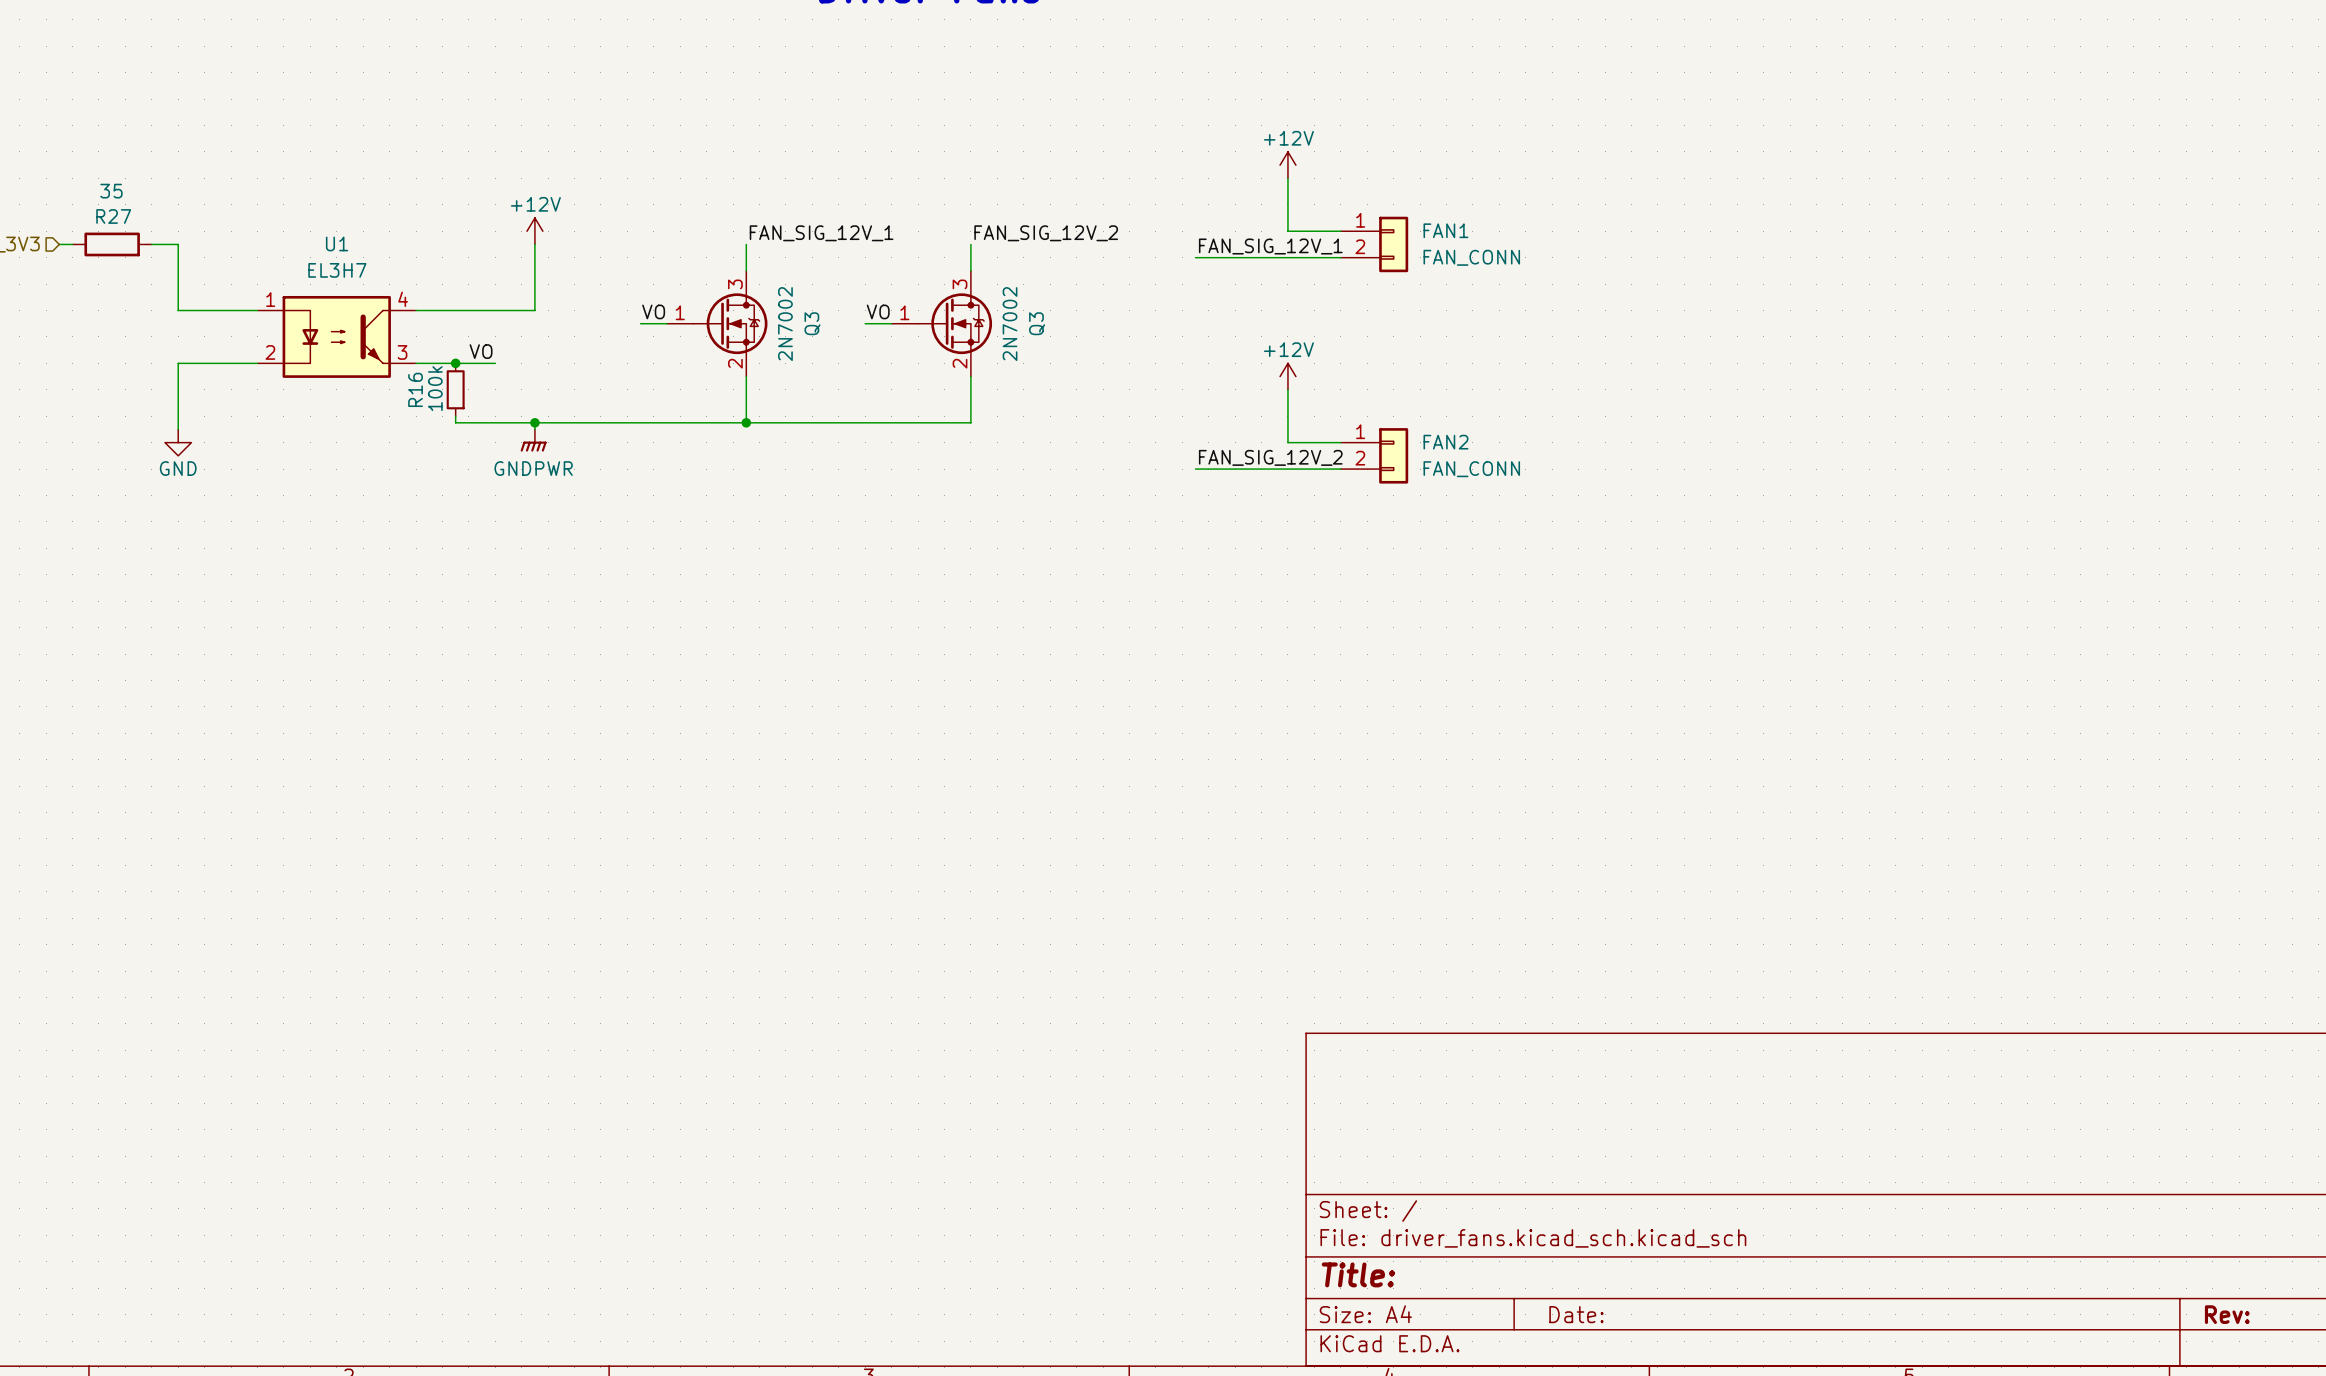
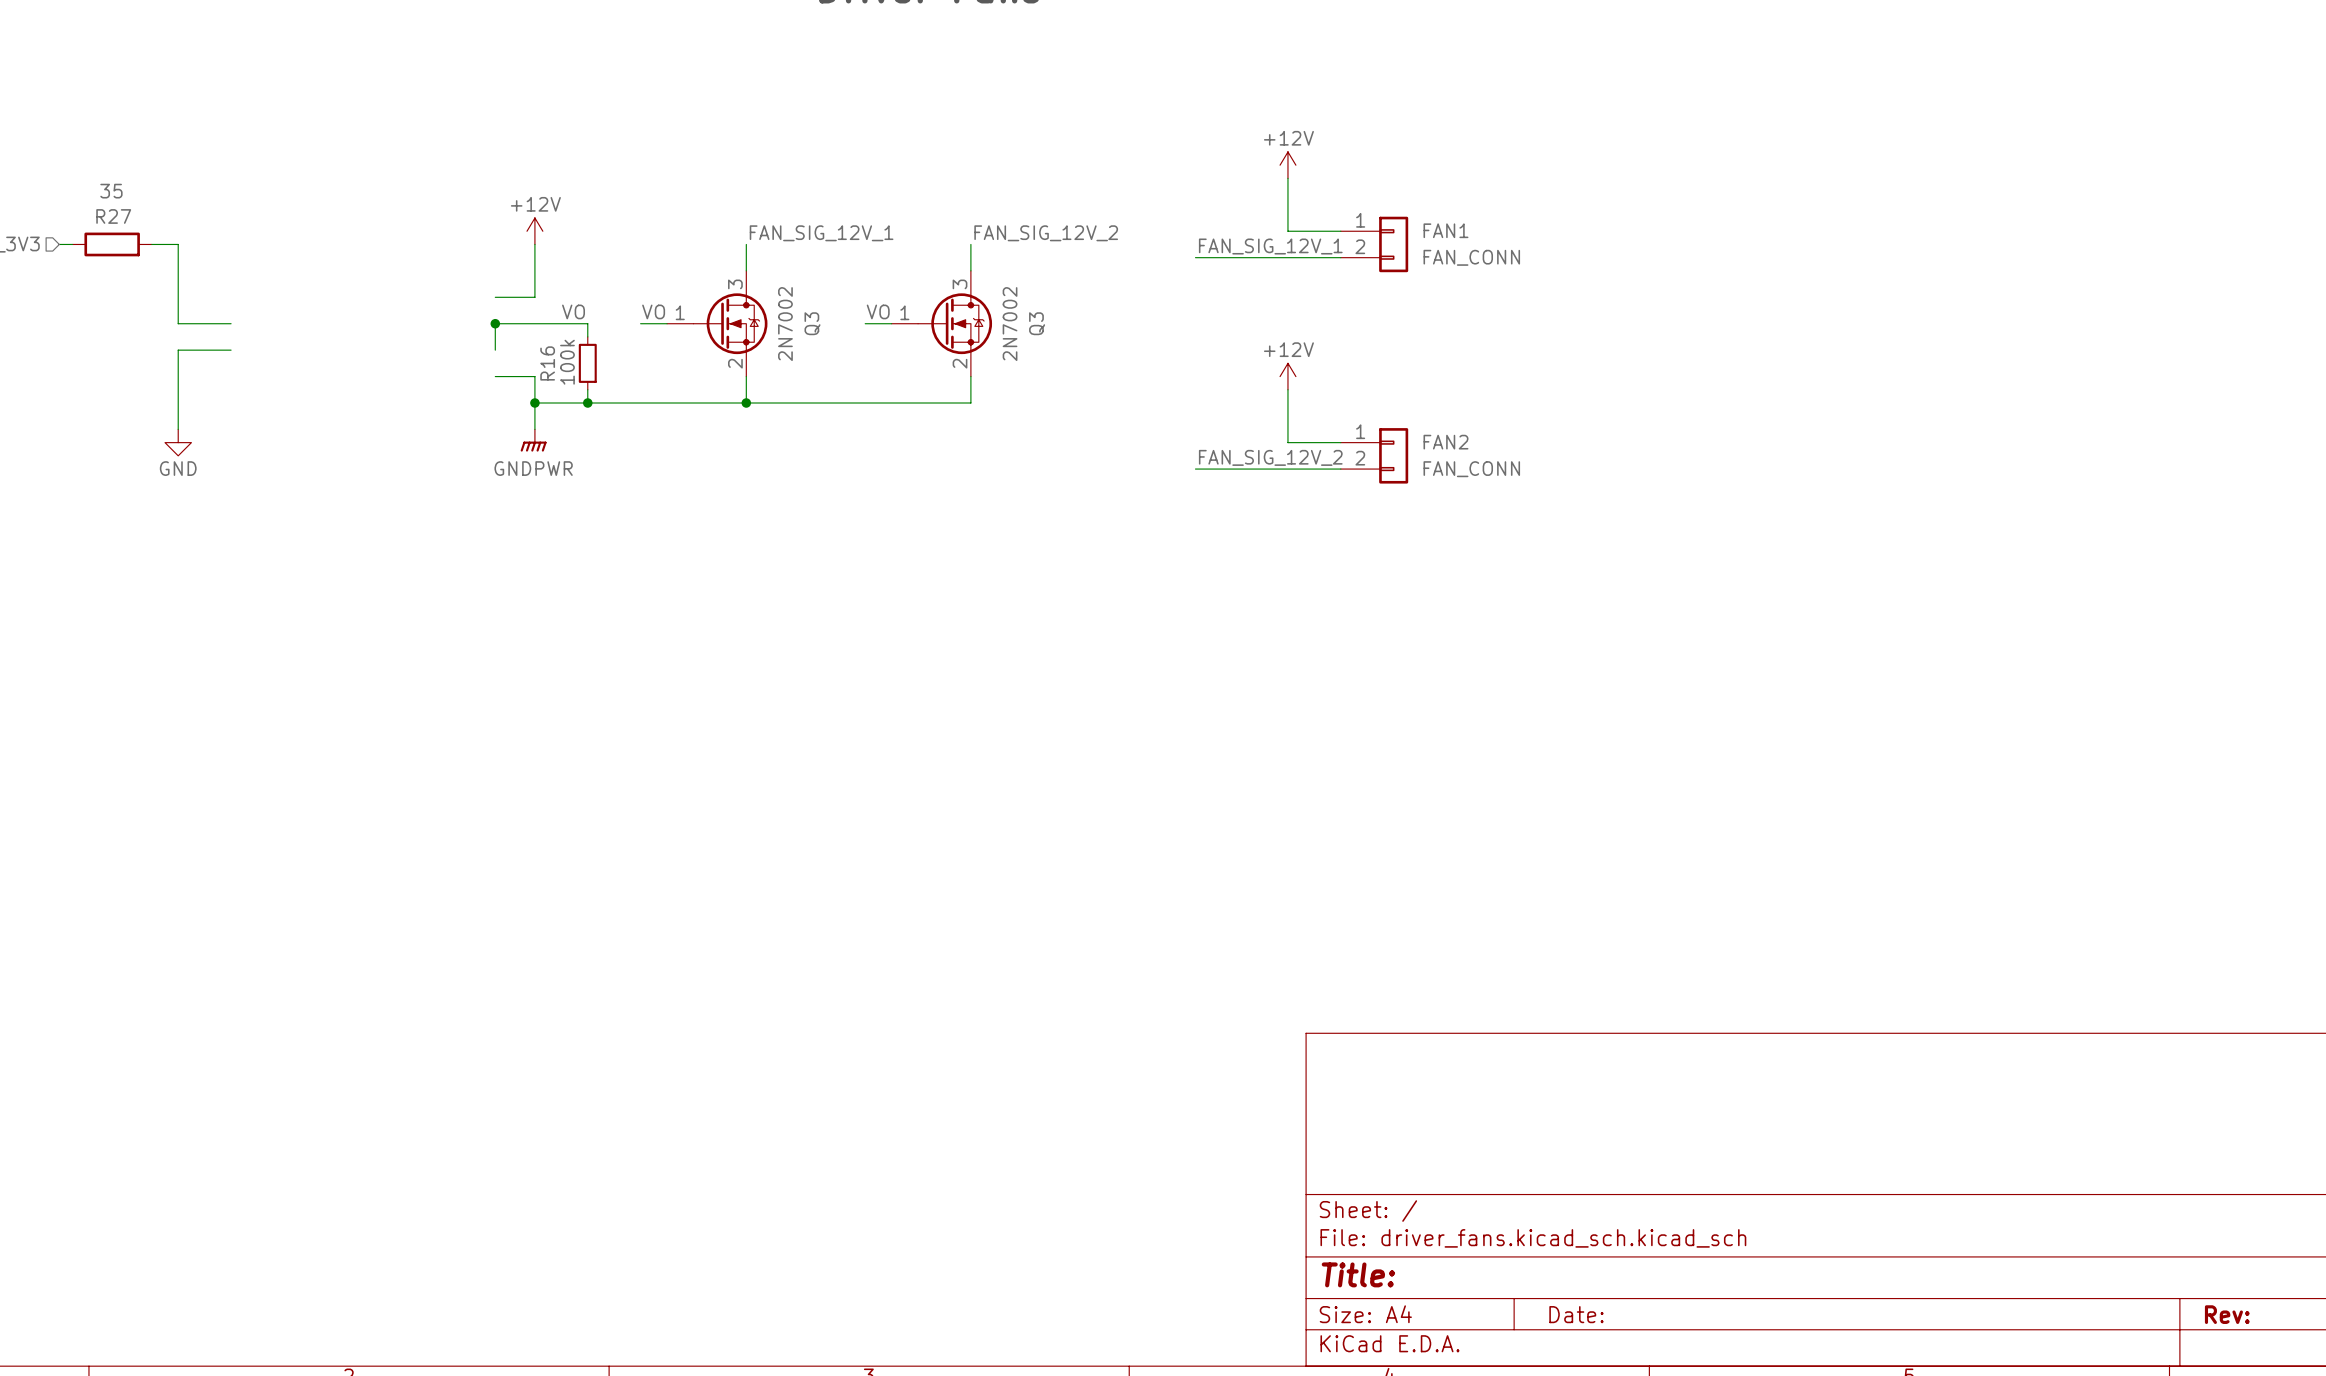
wire: (534, 297) (534, 310) (416, 310) -> (534, 297) (495, 297)
wire: (178, 310) (257, 310) -> (178, 310) (178, 323) (231, 323)
junction: none -> (495, 323)
U1: EL3H7 (336, 336) -> none
wire: none -> (587, 336) (587, 323) (495, 323) (495, 350)
label position: VO (481, 351) -> VO (573, 311)
wire: (178, 363) (257, 363) -> (178, 363) (178, 350) (231, 350)
wire: (416, 363) (495, 363) -> none
junction: (455, 363) -> none
wire: none -> (495, 376) (534, 376) (534, 422)
R16 position: (455, 389) -> (587, 363)
wire: none -> (587, 389) (587, 402)
junction: none -> (587, 402)
wire: (746, 402) (746, 422) -> none
wire: (970, 402) (970, 422) (455, 422) (455, 416) -> (970, 402) (534, 402)
junction position: (534, 422) -> (534, 402)
junction position: (746, 422) -> (746, 402)

